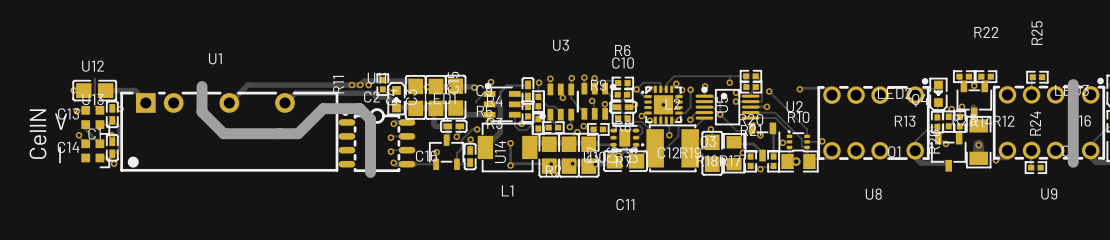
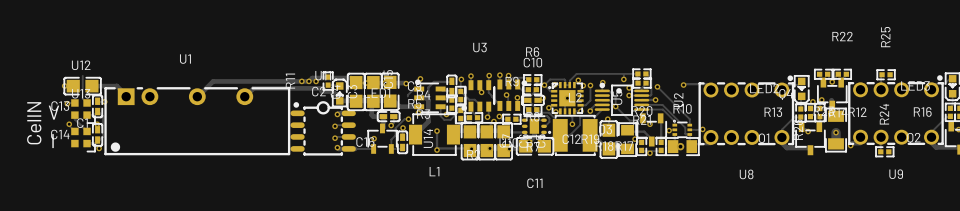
board edge: (1073, 84) (1073, 162) -> none
board edge: (202, 86) (202, 112) (223, 133) (298, 133) (323, 108) (359, 108) (370, 119) (370, 172) -> none
U2 name rotation: 0° (794, 106) -> 90° counterclockwise (678, 100)

